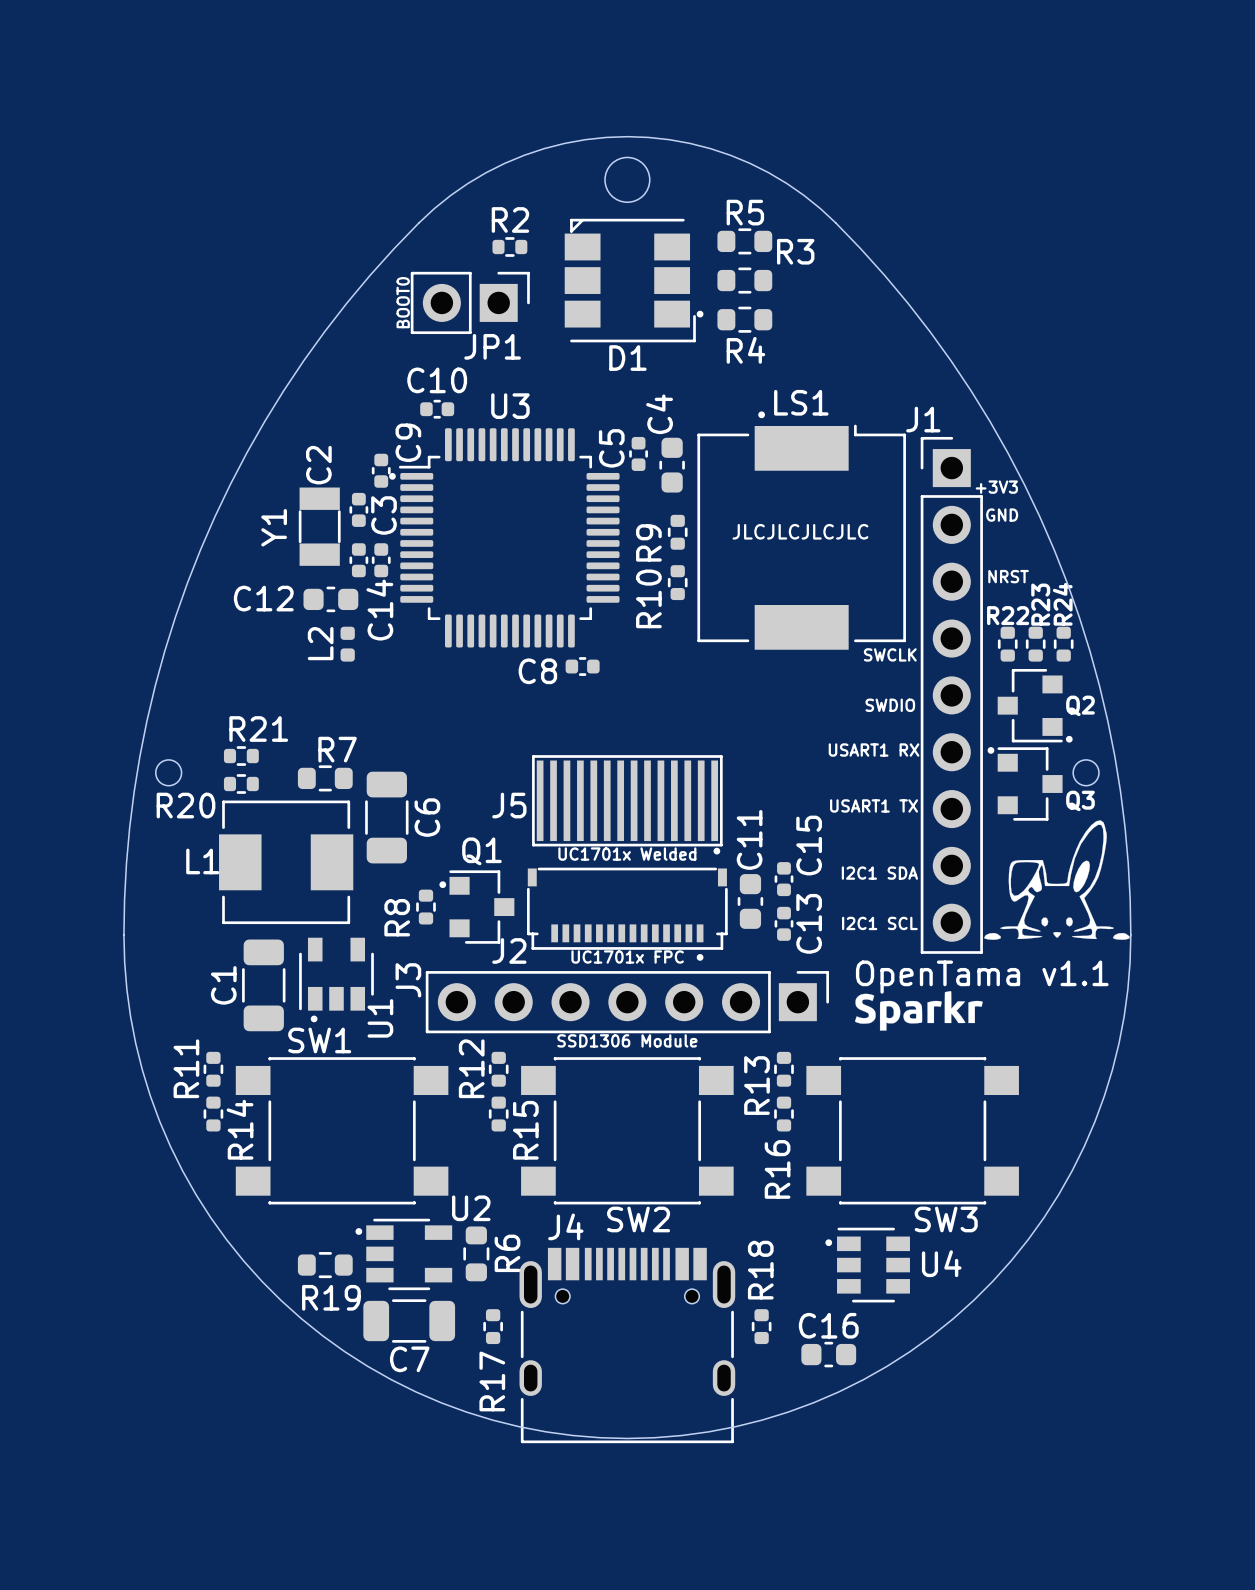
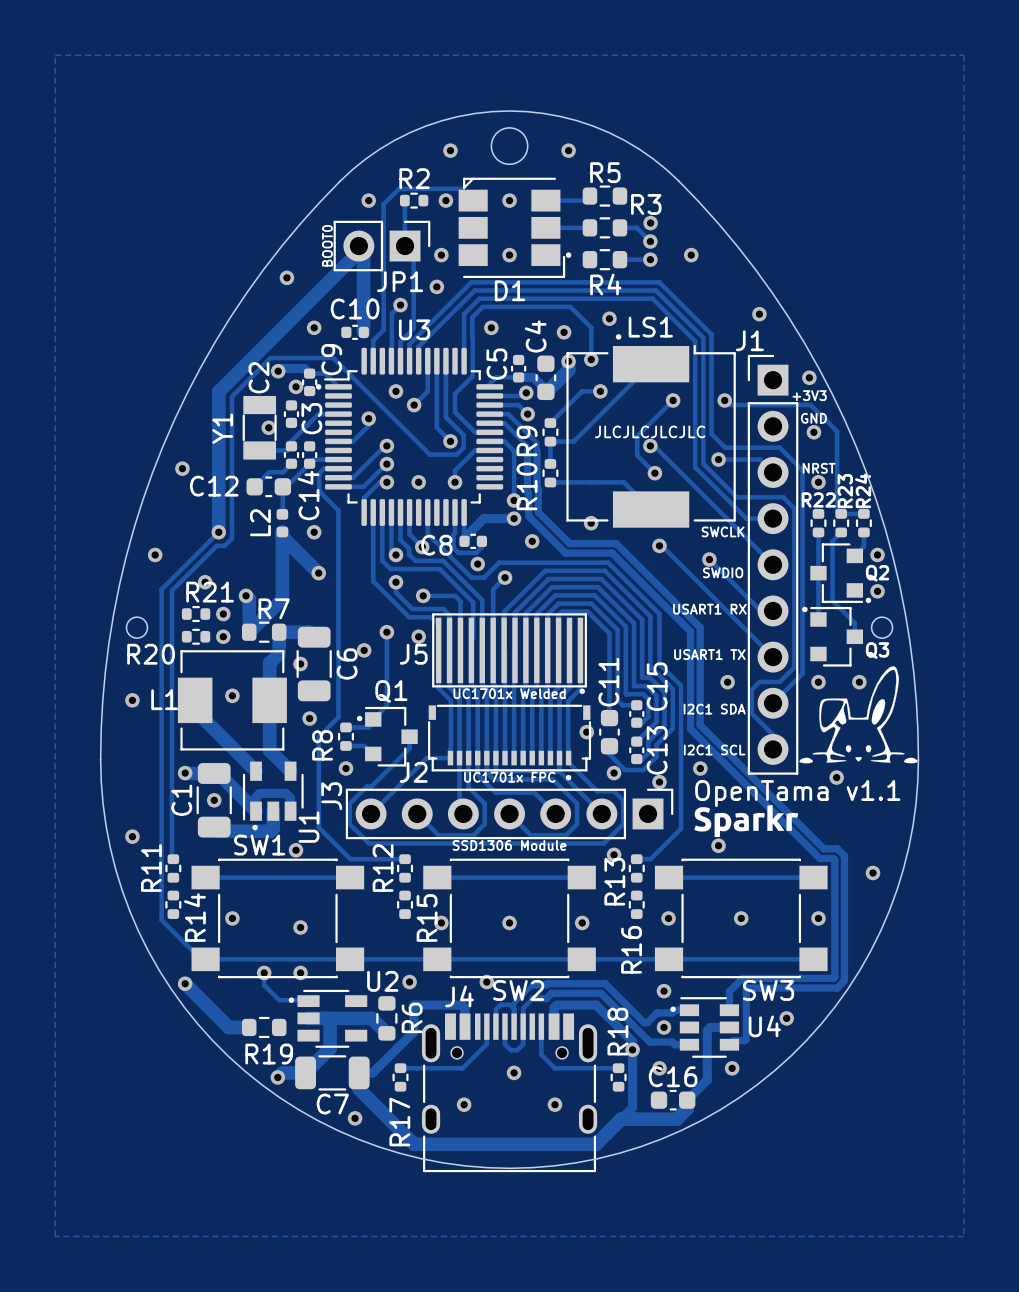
zone outline: none -> (55, 55) (55, 1236) (963, 1236) (963, 55) (55, 55)
via: none -> (450, 150)
via: none -> (568, 150)
track: none -> (589, 196) (585, 200) (545, 200)
via: none -> (368, 200)
track: none -> (404, 200) (404, 245) (413, 254) (413, 328) (400, 341) (400, 361)
via: none -> (445, 200)
track: none -> (473, 200) (461, 188) (398, 188) (383, 204) (383, 330) (373, 340) (373, 361)
via: none -> (509, 200)
via: none -> (650, 223)
track: none -> (545, 227) (589, 227)
track: none -> (619, 227) (636, 227) (650, 241)
via: none -> (650, 241)
via: none -> (441, 255)
via: none -> (509, 255)
via: none -> (691, 255)
track: none -> (619, 259) (650, 259)
via: none -> (650, 259)
via: none -> (286, 277)
via: none -> (436, 286)
track: none -> (400, 305) (391, 313) (391, 361)
via: none -> (400, 305)
via: none -> (759, 314)
via: none -> (609, 318)
via: none -> (314, 327)
via: none -> (491, 327)
track: none -> (363, 332) (363, 250) (358, 246) (358, 251) (218, 391) (218, 532) (161, 589) (161, 919) (200, 959) (813, 959)
via: none -> (564, 332)
track: none -> (591, 359) (591, 327) (570, 306) (482, 306) (472, 317) (472, 376) (455, 393) (455, 412) (475, 432) (489, 432)
via: none -> (591, 359)
track: none -> (409, 361) (409, 344) (471, 282) (659, 282) (711, 334) (711, 433) (725, 447) (779, 447) (802, 470) (802, 673) (773, 703)
track: none -> (418, 361) (418, 346) (474, 290) (656, 290) (703, 337) (703, 463) (736, 497) (783, 497) (794, 508) (794, 667) (779, 681) (759, 681) (751, 689) (751, 713) (773, 734) (773, 749)
track: none -> (427, 361) (427, 391) (414, 405)
track: none -> (436, 361) (436, 427) (450, 441)
track: none -> (445, 361) (445, 417) (463, 435) (463, 447) (456, 454) (429, 454) (333, 358) (270, 358) (231, 396) (231, 538) (224, 545) (216, 545) (171, 590) (173, 859)
track: none -> (464, 361) (464, 314) (479, 298) (652, 298) (695, 341) (695, 467) (746, 518) (773, 518)
track: none -> (568, 361) (568, 370) (546, 391) (533, 377) (496, 377) (489, 383) (489, 386)
via: none -> (568, 361)
track: none -> (651, 364) (573, 441) (550, 441) (550, 463)
track: none -> (278, 368) (278, 371) (282, 368) (304, 368) (309, 373) (325, 373) (338, 386)
via: none -> (278, 371)
via: none -> (809, 377)
via: none -> (296, 386)
via: none -> (395, 391)
track: none -> (600, 391) (582, 391) (550, 423)
via: none -> (600, 391)
track: none -> (526, 392) (523, 395) (489, 395)
via: none -> (526, 392)
track: none -> (673, 400) (637, 436) (637, 455) (654, 473)
via: none -> (673, 400)
track: none -> (724, 400) (729, 404) (810, 404) (837, 431) (837, 509) (841, 513) (863, 513)
via: none -> (724, 400)
via: none -> (414, 405)
track: none -> (489, 405) (518, 405) (527, 414)
track: none -> (338, 414) (318, 414) (291, 441) (291, 446) (287, 450) (259, 450)
track: none -> (489, 414) (508, 414) (537, 442) (538, 512) (569, 543) (616, 543) (700, 627) (700, 725) (823, 848) (837, 848) (844, 855) (844, 980) (837, 988) (746, 988) (746, 1039) (733, 1040) (729, 1044)
via: none -> (527, 414)
track: none -> (368, 418) (368, 425) (353, 441) (338, 441)
via: none -> (368, 418)
track: none -> (489, 423) (504, 423) (527, 446) (528, 516) (565, 553) (612, 553) (690, 631) (690, 729) (819, 858) (834, 859) (834, 976) (742, 978) (729, 991) (729, 1010)
via: none -> (268, 427)
via: none -> (813, 432)
via: none -> (450, 441)
track: none -> (489, 441) (504, 441) (514, 451) (514, 500)
track: none -> (384, 445) (353, 477) (338, 477)
via: none -> (386, 445)
track: none -> (650, 445) (654, 445) (773, 564)
via: none -> (650, 445)
track: none -> (489, 450) (475, 450) (455, 470) (455, 482)
track: none -> (338, 459) (313, 459) (286, 486) (282, 486) (282, 514)
track: none -> (718, 459) (760, 459) (773, 472)
via: none -> (718, 459)
track: none -> (291, 463) (282, 472) (269, 472) (254, 486)
track: none -> (386, 464) (363, 486) (338, 486)
via: none -> (386, 464)
via: none -> (182, 468)
track: none -> (338, 468) (323, 468) (319, 473) (319, 491) (338, 510) (338, 717) (318, 736) (318, 827) (350, 859) (405, 859)
via: none -> (654, 473)
track: none -> (386, 482) (379, 482) (364, 497) (364, 512)
via: none -> (386, 482)
via: none -> (418, 482)
via: none -> (455, 482)
via: none -> (818, 482)
track: none -> (550, 482) (624, 482) (651, 509)
via: none -> (514, 500)
track: none -> (373, 512) (373, 581) (409, 617) (430, 617) (438, 624) (438, 688) (450, 700) (450, 759)
track: none -> (382, 512) (382, 560) (390, 569) (439, 569) (473, 602) (471, 684) (477, 691) (477, 774) (495, 792) (534, 792) (555, 813)
track: none -> (391, 512) (391, 550) (395, 554)
track: none -> (400, 512) (400, 540) (409, 548) (409, 554) (415, 560) (443, 560) (482, 599) (482, 684) (486, 688) (486, 772) (493, 779) (552, 779) (577, 803) (577, 824) (565, 835) (530, 835) (509, 813)
track: none -> (409, 512) (409, 534) (422, 547)
track: none -> (427, 512) (427, 533) (471, 577) (484, 577) (499, 562) (608, 562) (659, 613) (659, 664) (681, 685) (681, 828) (650, 859) (636, 859)
track: none -> (455, 512) (453, 547) (458, 552) (476, 552) (481, 546) (481, 541)
track: none -> (464, 512) (464, 541) (465, 536) (483, 518) (514, 518)
via: none -> (514, 518)
via: none -> (591, 523)
via: none -> (218, 532)
track: none -> (282, 531) (282, 599) (249, 632) (249, 599) (246, 595)
via: none -> (314, 532)
track: none -> (818, 532) (818, 619)
track: none -> (841, 532) (832, 541) (832, 600) (854, 623) (854, 636)
track: none -> (863, 532) (863, 546) (854, 555)
track: none -> (282, 536) (318, 573)
via: none -> (532, 541)
track: none -> (659, 545) (661, 545) (773, 657)
via: none -> (659, 545)
via: none -> (422, 547)
via: none -> (155, 554)
via: none -> (395, 554)
via: none -> (877, 554)
track: none -> (709, 559) (760, 610) (773, 610)
via: none -> (709, 559)
via: none -> (477, 564)
via: none -> (318, 573)
track: none -> (505, 577) (493, 589) (495, 769) (559, 771) (601, 813)
via: none -> (505, 577)
via: none -> (205, 582)
track: none -> (395, 582) (395, 592) (412, 609) (443, 609) (449, 615) (449, 687) (459, 697) (459, 810) (463, 813)
via: none -> (395, 582)
via: none -> (877, 591)
via: none -> (246, 595)
track: none -> (423, 595) (455, 595) (460, 601) (460, 685) (468, 693) (468, 787) (484, 803) (484, 824) (473, 835) (438, 835) (417, 813)
via: none -> (423, 595)
via: none -> (223, 614)
track: none -> (386, 632) (386, 705) (373, 719) (373, 723) (368, 727) (345, 727)
via: none -> (386, 632)
via: none -> (223, 636)
track: none -> (314, 637) (309, 632) (279, 632) (279, 653) (269, 663) (269, 750) (290, 771)
via: none -> (418, 636)
via: none -> (364, 650)
track: none -> (569, 650) (569, 688) (559, 698) (558, 771)
track: none -> (580, 650) (580, 689) (568, 701) (568, 762) (597, 791) (614, 791) (623, 800) (623, 824) (603, 843) (368, 843) (349, 824) (349, 803) (366, 786) (371, 786) (409, 748) (409, 736)
via: none -> (300, 664)
via: none -> (727, 682)
via: none -> (818, 682)
via: none -> (859, 682)
via: none -> (232, 695)
via: none -> (132, 700)
track: none -> (195, 700) (195, 710) (256, 771)
track: none -> (636, 705) (622, 705) (617, 700) (617, 630) (591, 603) (558, 603) (547, 614) (547, 686) (541, 693) (541, 759)
via: none -> (309, 718)
track: none -> (609, 718) (609, 633) (587, 611) (562, 611) (558, 615) (558, 687) (550, 695) (550, 759)
track: none -> (636, 722) (642, 722) (648, 716) (648, 699) (643, 694) (625, 694) (625, 626) (594, 595) (555, 595) (536, 613) (536, 686) (532, 690) (532, 759)
via: none -> (586, 732)
track: none -> (636, 741) (656, 721) (656, 695) (646, 686) (634, 686) (634, 623) (598, 587) (551, 587) (525, 613) (523, 759)
track: none -> (345, 745) (364, 745) (373, 753)
track: none -> (609, 746) (609, 754) (625, 770) (643, 770) (656, 756) (656, 745) (672, 728) (672, 689) (650, 668) (650, 616) (604, 570) (545, 570) (504, 611) (505, 759)
track: none -> (450, 758) (426, 758) (371, 813)
track: none -> (636, 759) (642, 759) (648, 753) (648, 741) (664, 725) (664, 692) (649, 677) (642, 677) (642, 619) (601, 579) (548, 579) (514, 612) (514, 759)
via: none -> (345, 768)
via: none -> (700, 768)
track: none -> (185, 773) (218, 773) (256, 811) (256, 797) (259, 793) (285, 793) (290, 798) (290, 811)
via: none -> (185, 773)
via: none -> (614, 773)
via: none -> (836, 777)
via: none -> (659, 782)
via: none -> (214, 800)
track: none -> (273, 811) (273, 828) (270, 831) (218, 831) (214, 827)
via: none -> (132, 836)
via: none -> (718, 845)
via: none -> (296, 850)
via: none -> (614, 854)
via: none -> (873, 873)
track: none -> (205, 877) (350, 877)
track: none -> (437, 877) (581, 877)
track: none -> (669, 877) (813, 877)
via: none -> (232, 918)
via: none -> (668, 918)
via: none -> (741, 918)
via: none -> (818, 918)
via: none -> (441, 922)
via: none -> (509, 922)
via: none -> (582, 922)
via: none -> (300, 927)
track: none -> (264, 972) (264, 985) (279, 1000) (308, 1001)
via: none -> (264, 972)
via: none -> (300, 972)
via: none -> (409, 982)
via: none -> (486, 982)
track: none -> (185, 983) (228, 1027) (249, 1027)
via: none -> (185, 983)
via: none -> (664, 991)
track: none -> (514, 1008) (509, 1004) (500, 1004) (495, 1009) (495, 1026)
track: none -> (689, 1010) (657, 1012) (647, 1022) (644, 1022) (605, 983) (532, 984) (514, 1003) (514, 1026)
track: none -> (308, 1018) (371, 1018) (386, 1033)
track: none -> (327, 1018) (330, 1021) (330, 1048) (305, 1072) (282, 1072) (277, 1077)
via: none -> (786, 1018)
track: none -> (465, 1026) (465, 1007) (462, 1005) (413, 1005) (413, 1031) (372, 1072) (359, 1072) (359, 1089) (414, 1144) (596, 1144) (620, 1119)
track: none -> (486, 1026) (486, 1044) (462, 1068) (400, 1068)
track: none -> (505, 1026) (505, 1044) (510, 1050) (517, 1050) (523, 1044) (523, 1008) (532, 998) (546, 998) (551, 993) (601, 993) (649, 1042) (672, 1042) (675, 1044) (689, 1044)
track: none -> (541, 1026) (541, 1054) (554, 1068) (618, 1068)
track: none -> (554, 1026) (554, 1007) (556, 1005) (596, 1005) (632, 1041) (632, 1107) (620, 1119) (676, 1119) (687, 1108) (687, 1100) (707, 1080) (707, 1030) (710, 1027) (729, 1027)
via: none -> (664, 1027)
via: none -> (632, 1049)
via: none -> (659, 1068)
via: none -> (732, 1068)
via: none -> (514, 1072)
via: none -> (277, 1077)
via: none -> (464, 1104)
via: none -> (554, 1104)
via: none -> (355, 1118)

